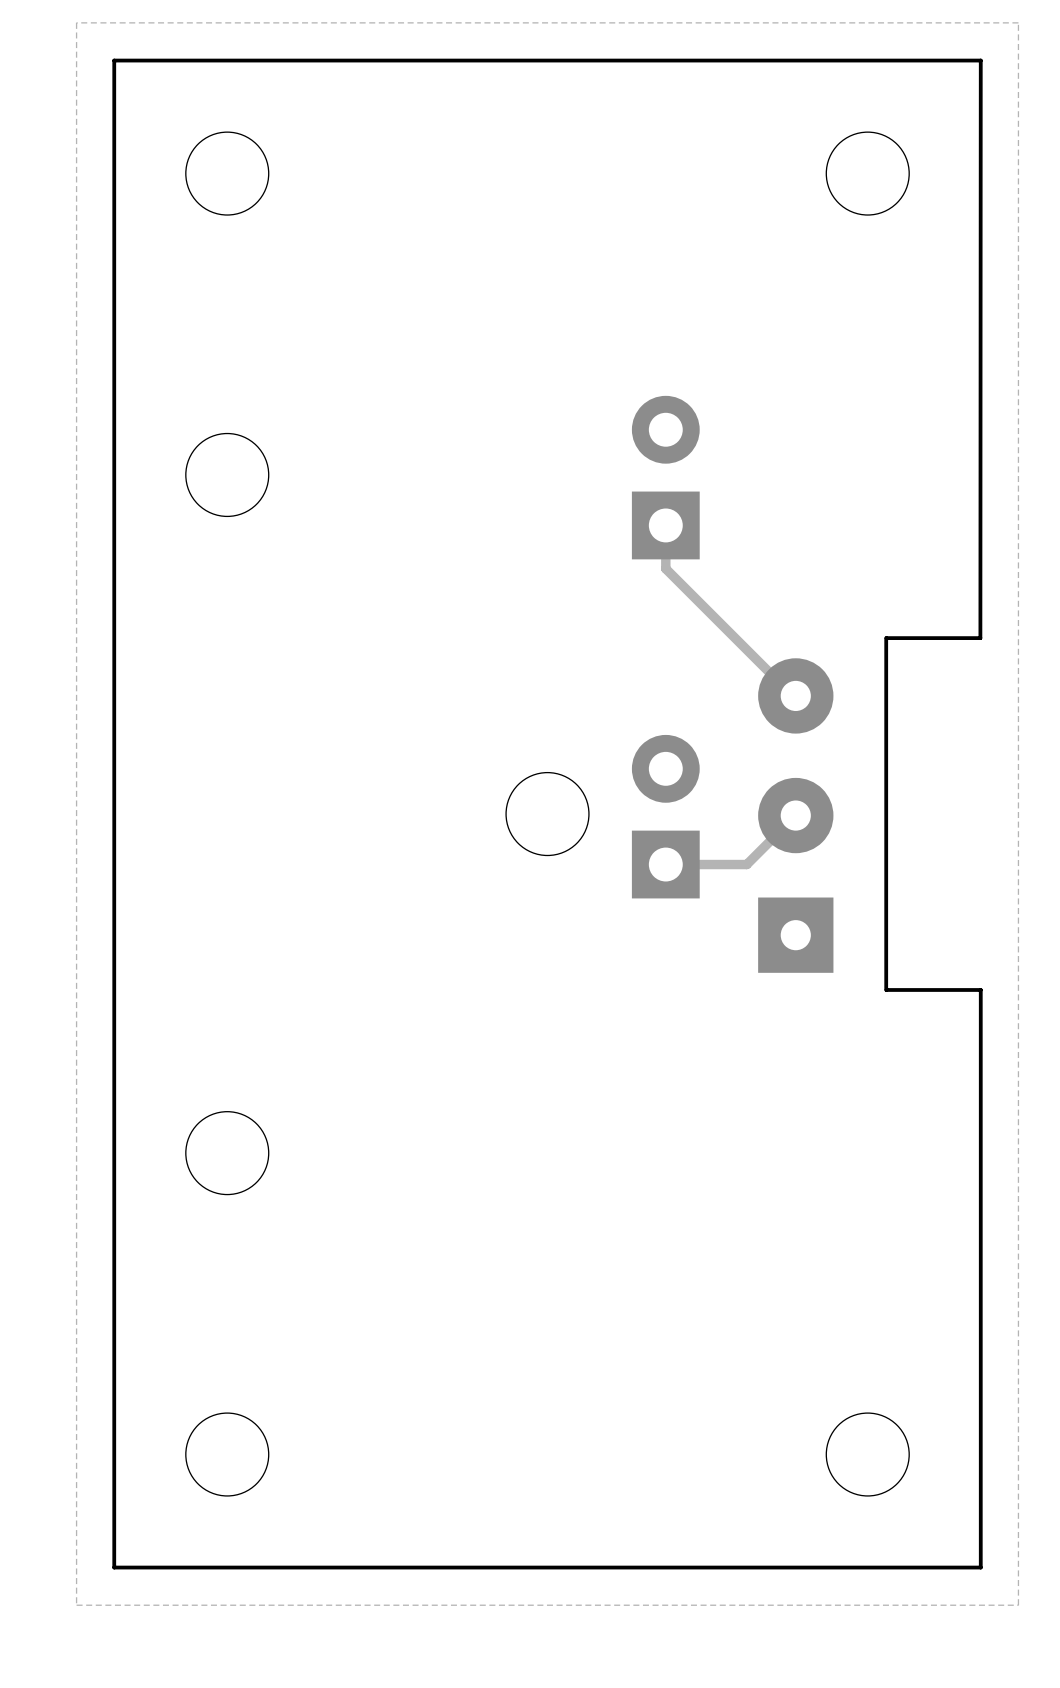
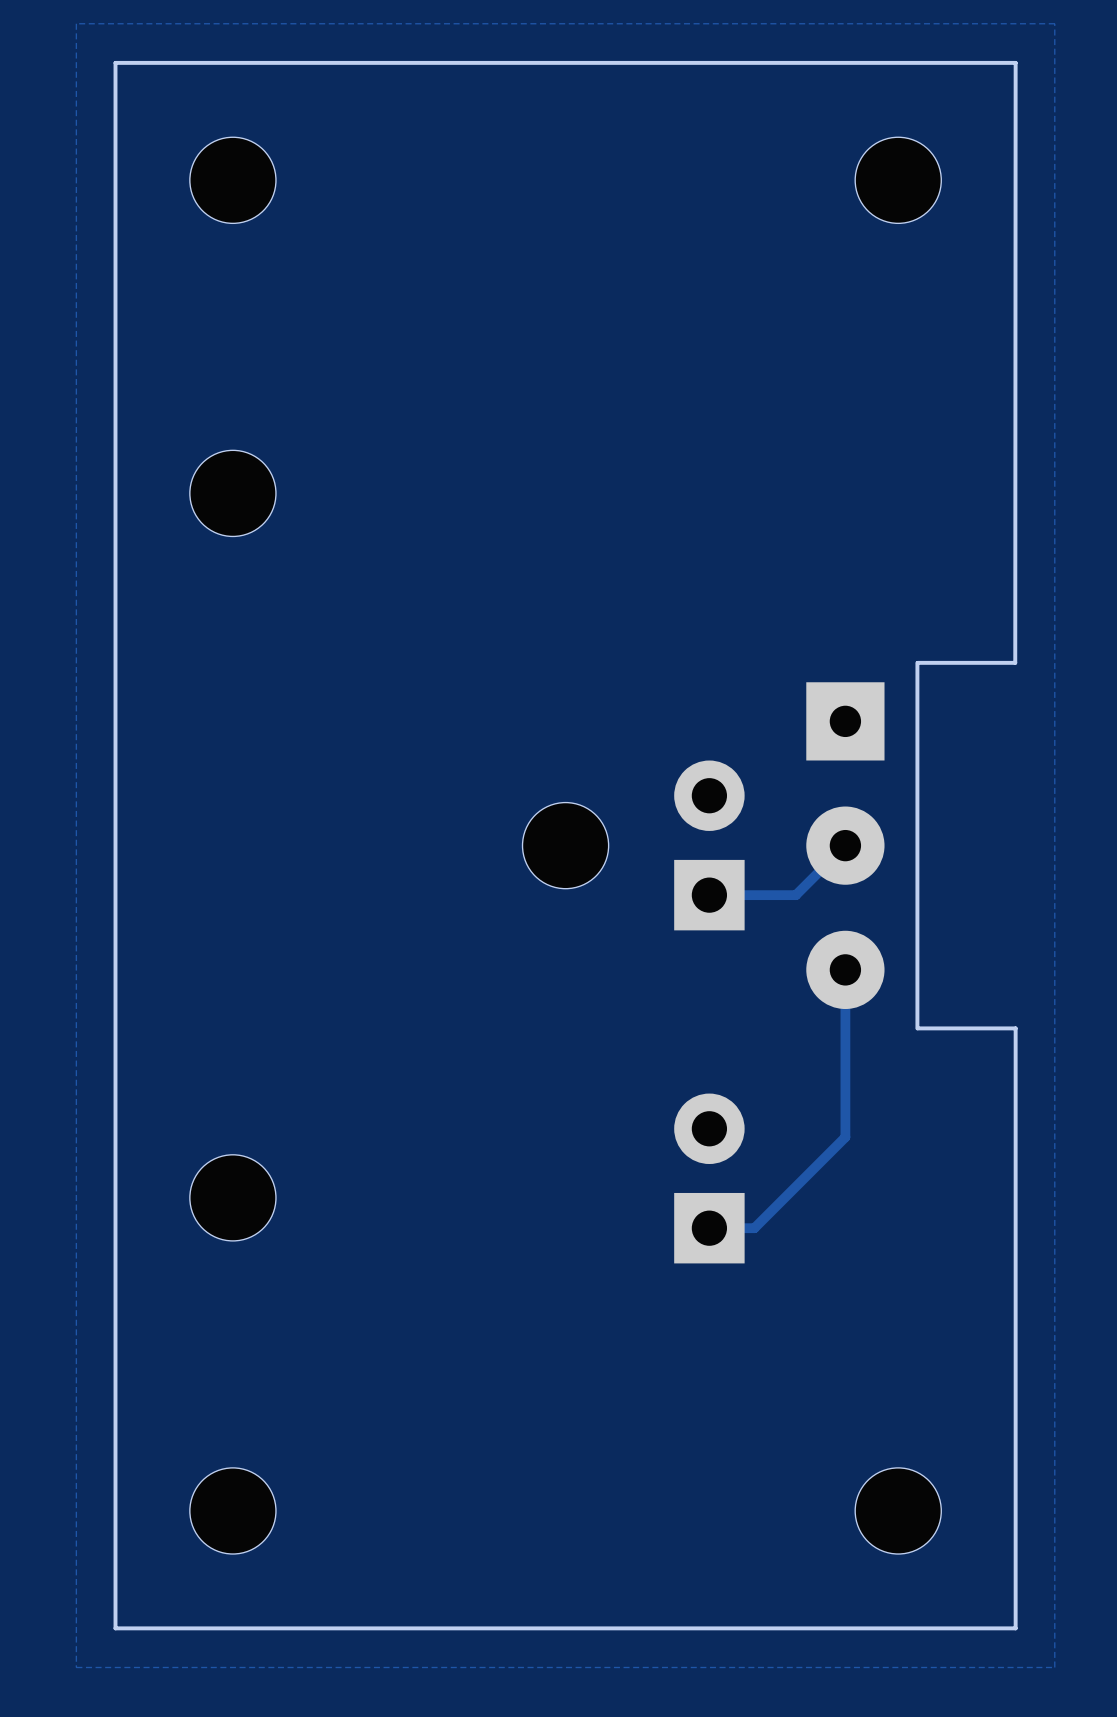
part position: (665, 477) -> (709, 1178)
track: (665, 525) (665, 568) (792, 695) -> none
track: none -> (845, 845) (795, 895) (709, 895)
track: (795, 815) (746, 864) (665, 864) -> none
part rotation: 0° (795, 815) -> 180° (845, 845)
part position: (665, 816) -> (709, 845)
track: none -> (845, 969) (845, 1137) (754, 1228) (709, 1228)

